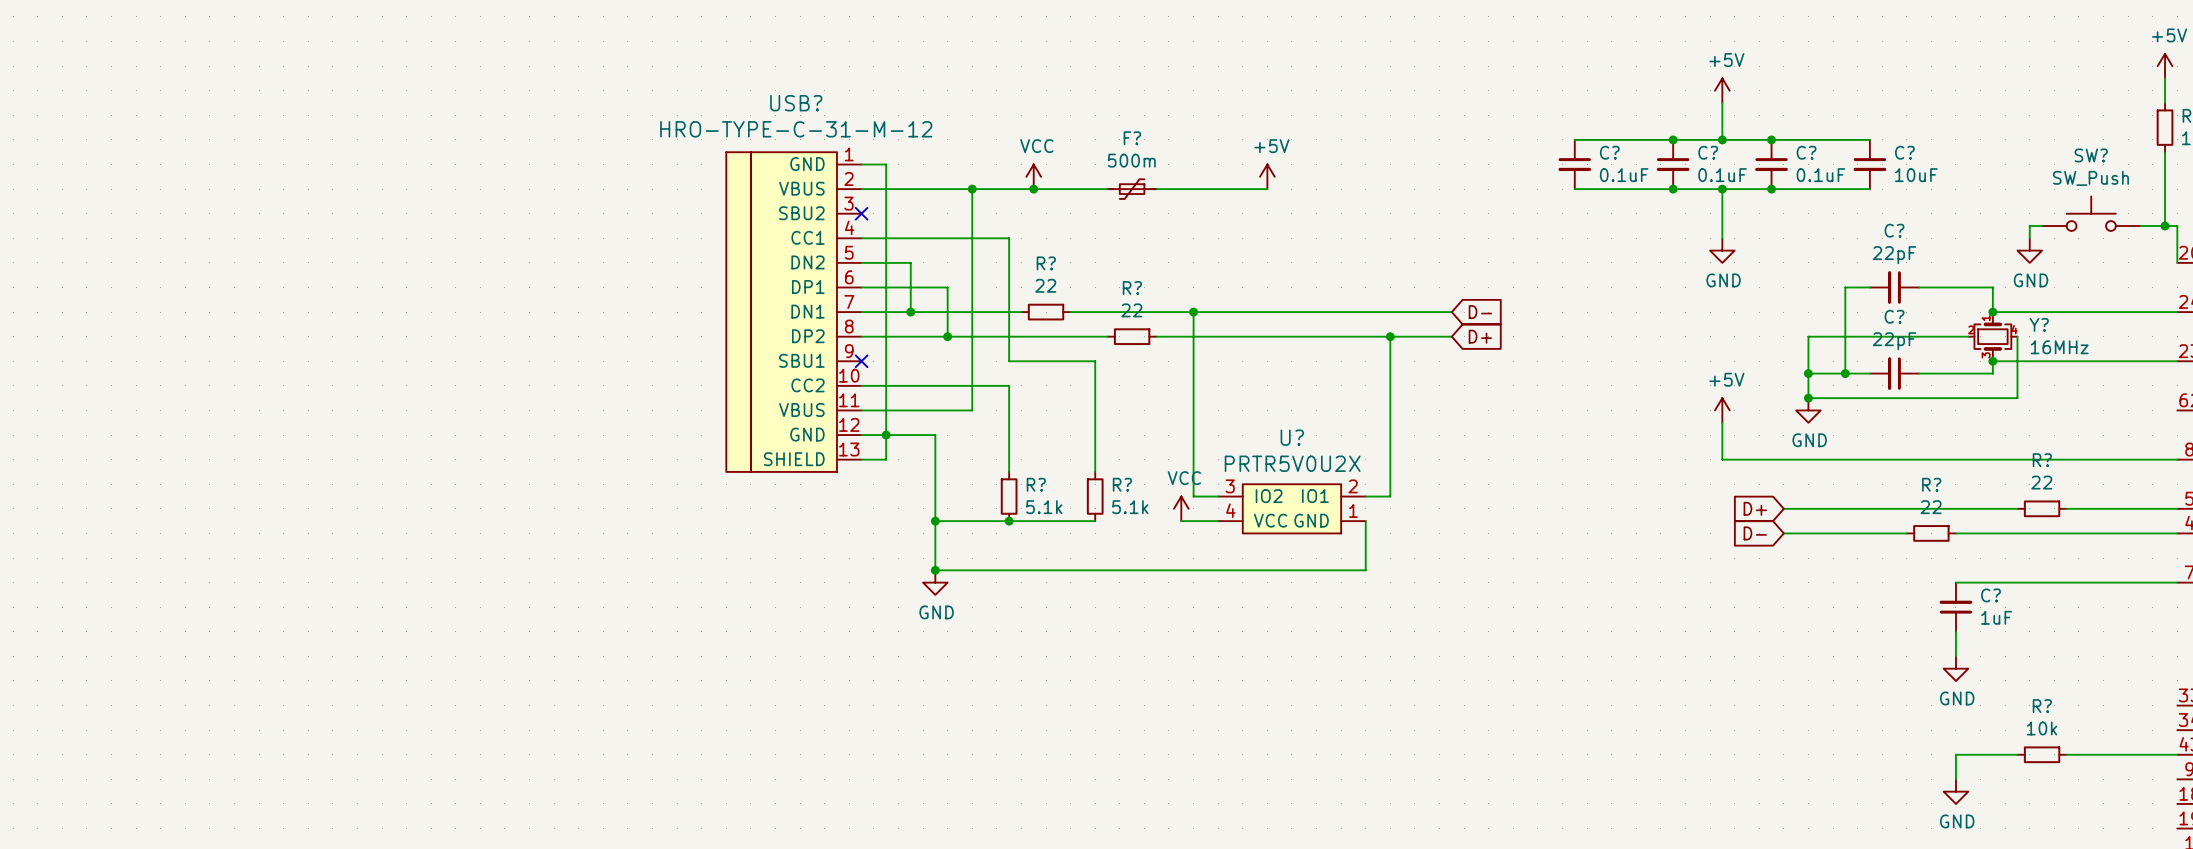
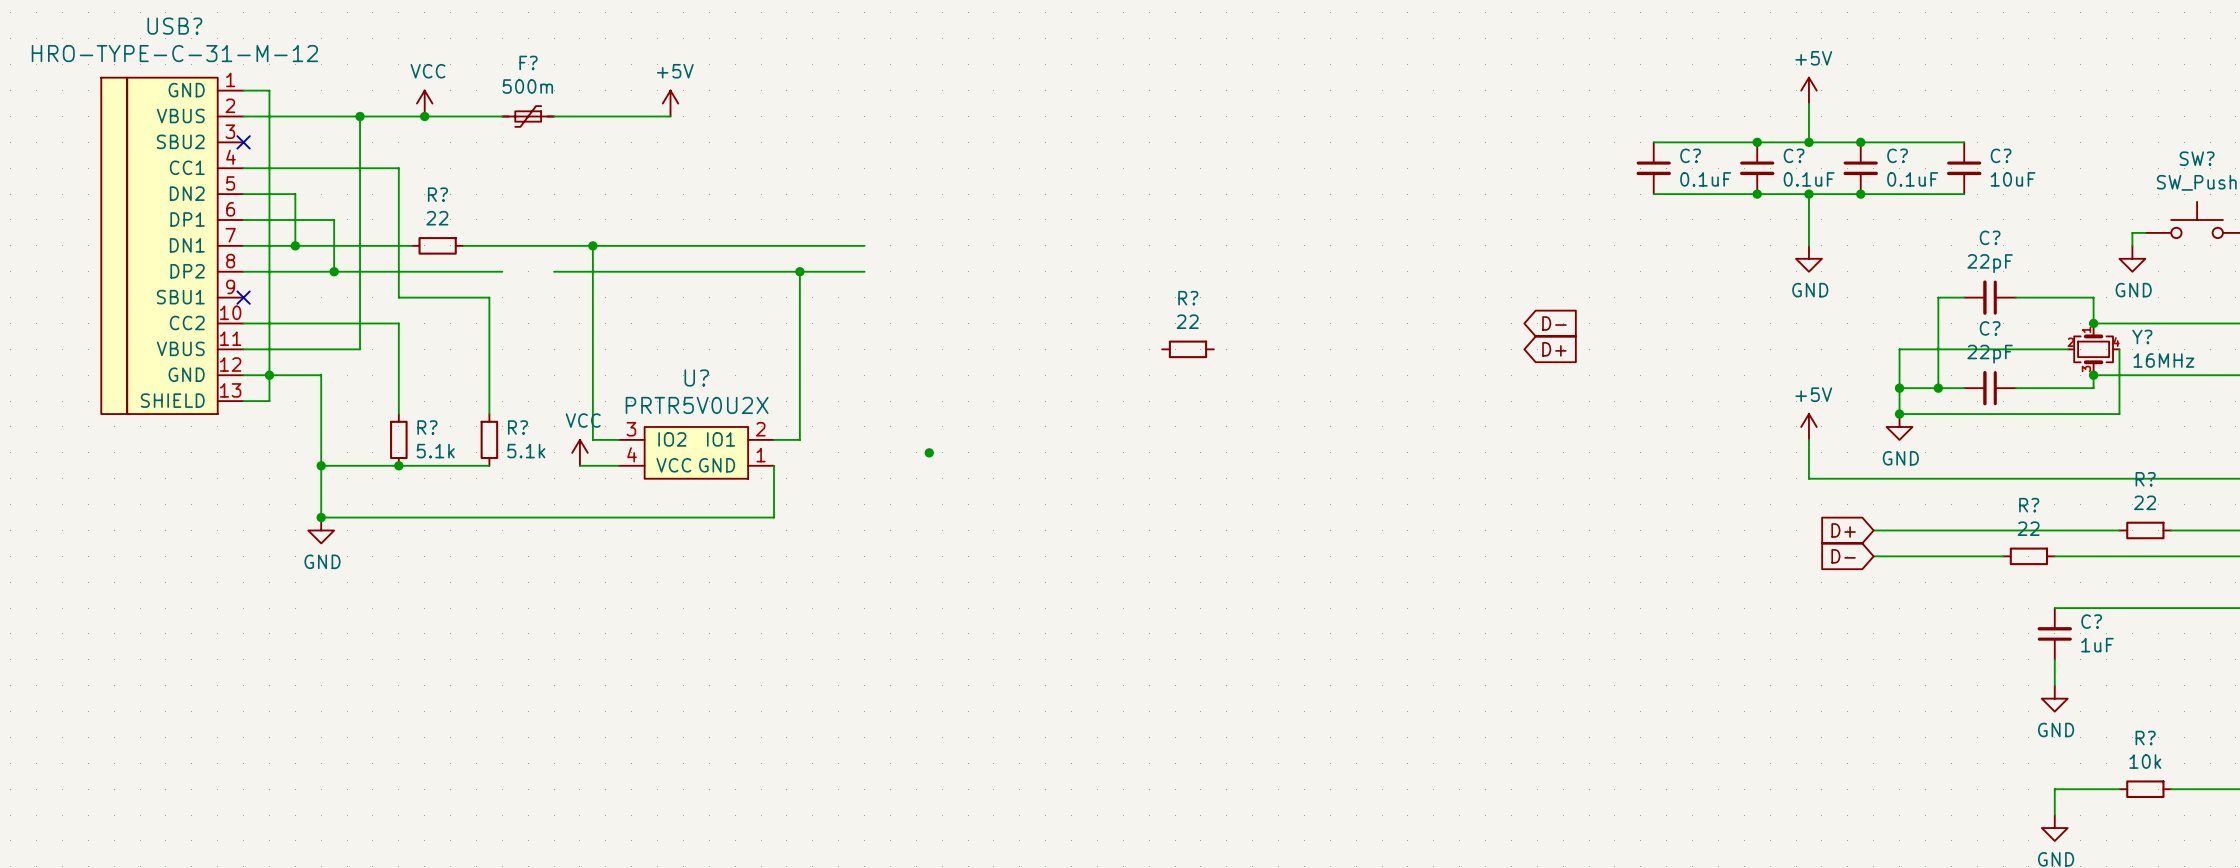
wire: none -> (243, 90) (269, 90) (269, 401) (243, 401)
power symbol: none -> VCC (424, 103)
power symbol: none -> +5V (670, 103)
wire: none -> (243, 116) (502, 116)
wire: none -> (360, 116) (360, 349) (243, 349)
junction: none -> (360, 116)
junction: none -> (424, 116)
F?: none -> 500m (528, 116)
wire: none -> (554, 116) (670, 116)
no-connect mark: none -> (243, 142)
wire: none -> (243, 168) (398, 168) (398, 297) (489, 297) (489, 414)
wire: (861, 164) (886, 164) (886, 459) (861, 459) -> none
power symbol: VCC (1033, 176) -> none
power symbol: +5V (1267, 176) -> none
wire: none -> (243, 194) (295, 194) (295, 245)
wire: (861, 189) (1107, 189) -> none
wire: (972, 189) (972, 410) (861, 410) -> none
junction: (972, 189) -> none
junction: (1033, 189) -> none
F?: 500m (1132, 189) -> none
wire: (1156, 189) (1267, 189) -> none
wire: none -> (243, 219) (334, 219) (334, 271)
no-connect mark: (861, 213) -> none
USB?: none -> HRO-TYPE-C-31-M-12 (172, 245)
wire: none -> (243, 245) (411, 245)
junction: none -> (295, 245)
R?: none -> 22 (437, 245)
wire: none -> (463, 245) (864, 245)
wire: none -> (592, 245) (592, 439) (618, 439)
junction: none -> (592, 245)
wire: (861, 238) (1009, 238) (1009, 361) (1095, 361) (1095, 471) -> none
wire: none -> (243, 271) (502, 271)
junction: none -> (334, 271)
wire: none -> (554, 271) (864, 271)
junction: none -> (799, 271)
wire: (861, 262) (910, 262) (910, 312) -> none
no-connect mark: none -> (243, 297)
wire: (861, 287) (947, 287) (947, 336) -> none
wire: none -> (243, 323) (398, 323) (398, 414)
USB?: HRO-TYPE-C-31-M-12 (793, 312) -> none
wire: (861, 312) (1021, 312) -> none
junction: (910, 312) -> none
R?: 22 (1046, 312) -> none
wire: (1070, 312) (1451, 312) -> none
wire: (1193, 312) (1193, 496) (1218, 496) -> none
junction: (1193, 312) -> none
wire: (861, 336) (1107, 336) -> none
junction: (947, 336) -> none
wire: (1156, 336) (1451, 336) -> none
wire: (1390, 336) (1390, 496) (1365, 496) -> none
junction: (1390, 336) -> none
wire: none -> (243, 375) (321, 375) (321, 517) (774, 517) (774, 465)
junction: none -> (269, 375)
no-connect mark: (861, 361) -> none
wire: (861, 385) (1009, 385) (1009, 471) -> none
R?: none -> 5.1k (398, 439)
R?: none -> 5.1k (489, 439)
power symbol: none -> VCC (579, 452)
U?: none -> PRTR5V0U2X (696, 452)
wire: (861, 435) (935, 435) (935, 570) (1365, 570) (1365, 521) -> none
wire: none -> (321, 465) (489, 465)
junction: none -> (321, 465)
junction: none -> (398, 465)
wire: none -> (579, 465) (618, 465)
junction: none -> (321, 517)
R?: 5.1k (1009, 496) -> none
R?: 5.1k (1095, 496) -> none
power symbol: none -> GND (321, 530)
power symbol: VCC (1181, 508) -> none
U?: PRTR5V0U2X (1291, 508) -> none
wire: (935, 521) (1095, 521) -> none
junction: (935, 521) -> none
junction: (1009, 521) -> none
wire: (1181, 521) (1218, 521) -> none
junction: (935, 570) -> none
power symbol: GND (935, 582) -> none

